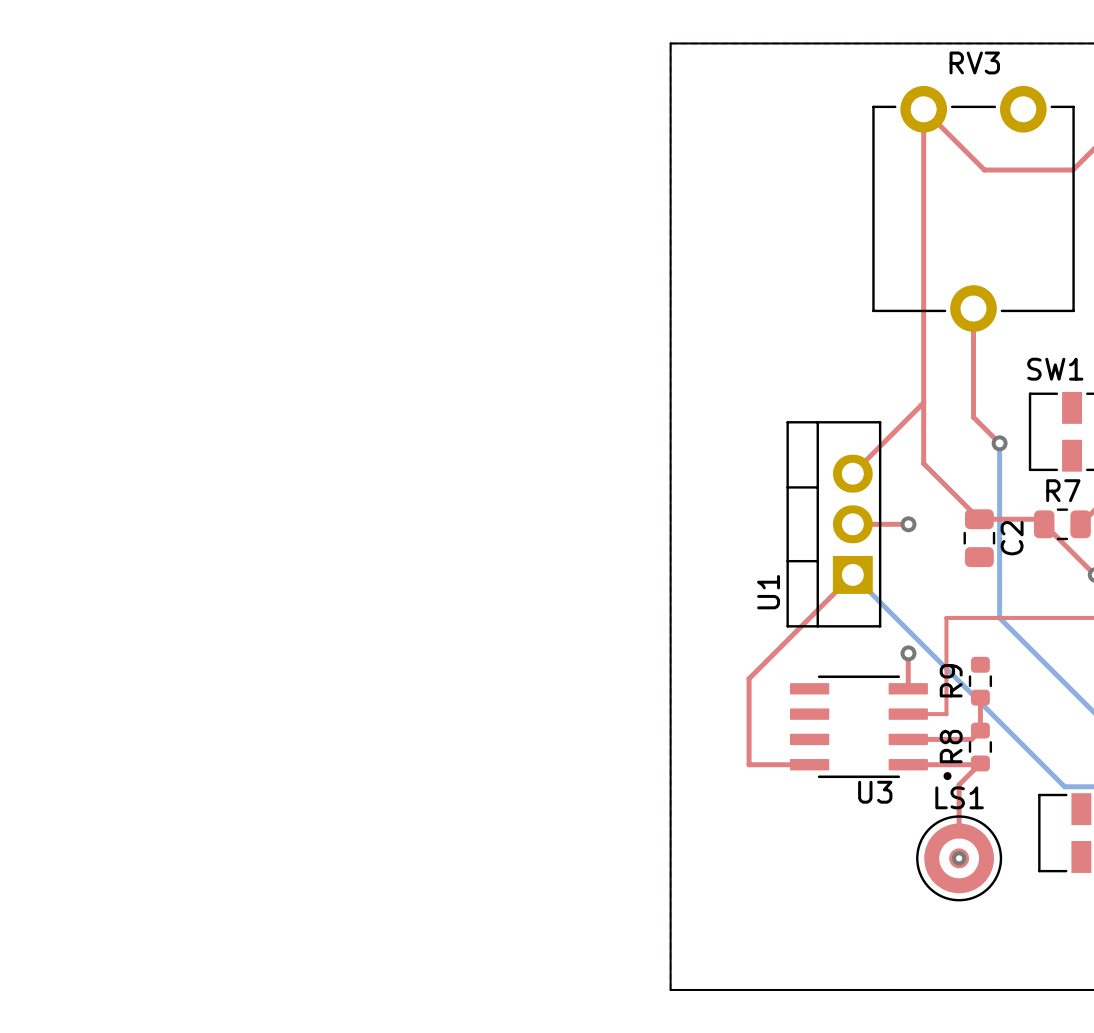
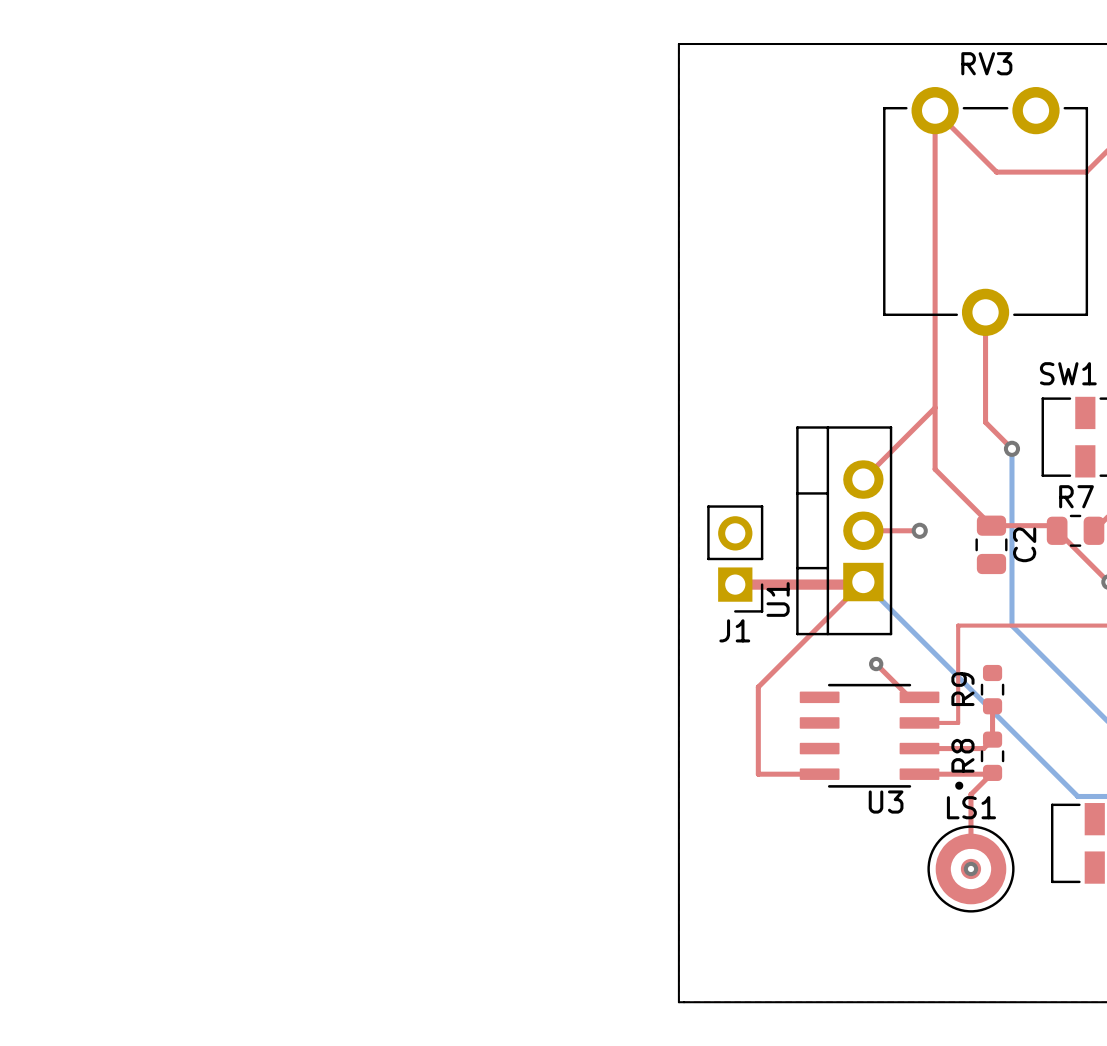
J1: none -> (735, 558)
top track: none -> (735, 584) (860, 584)
top track: (908, 653) (908, 688) -> (876, 664) (909, 697) (919, 697)
via: (908, 653) -> none
via: none -> (876, 664)

